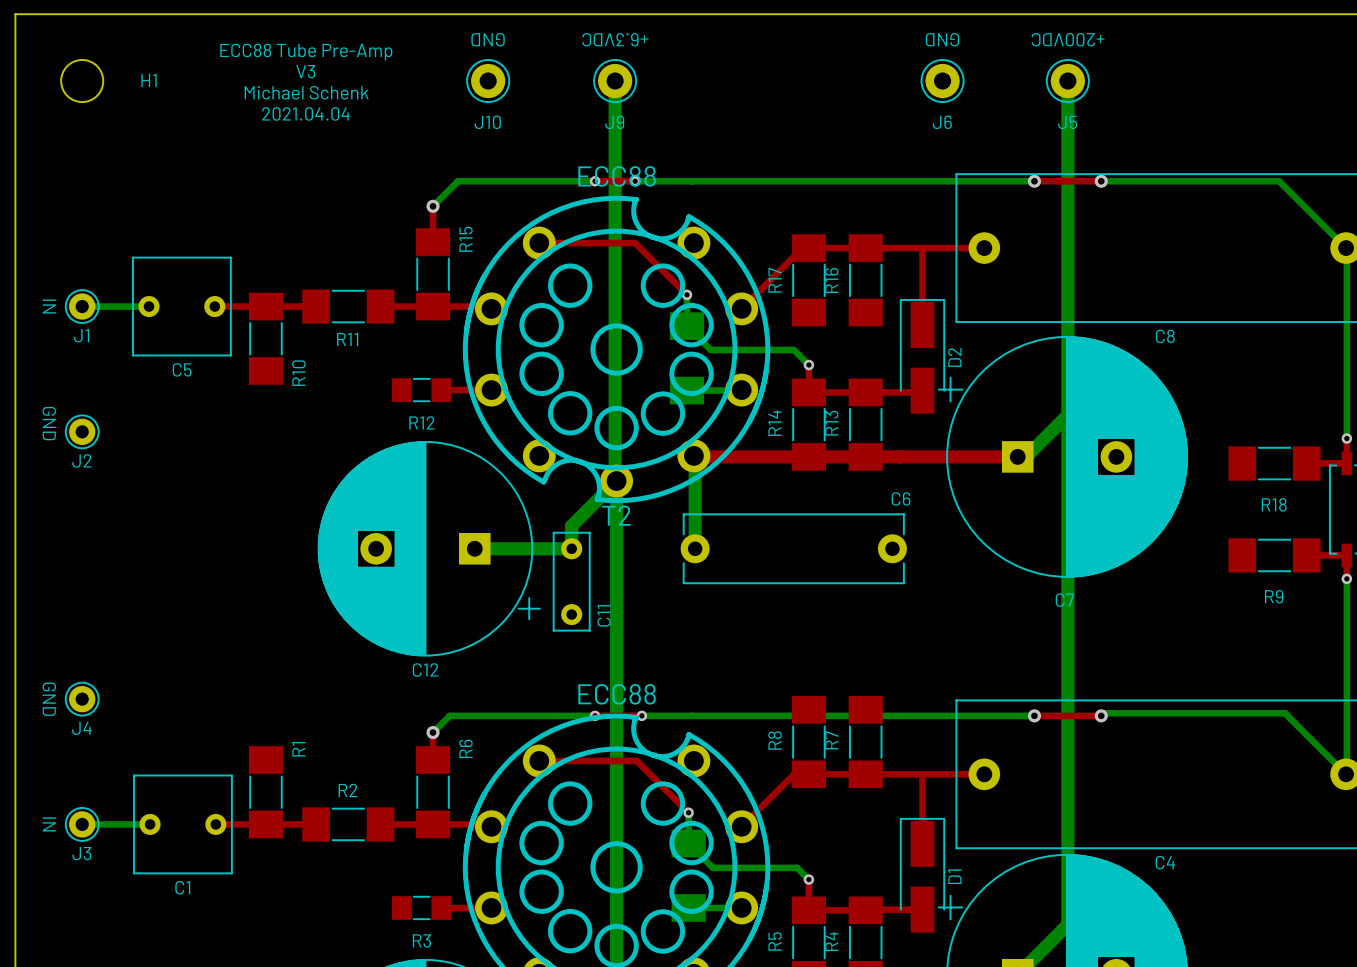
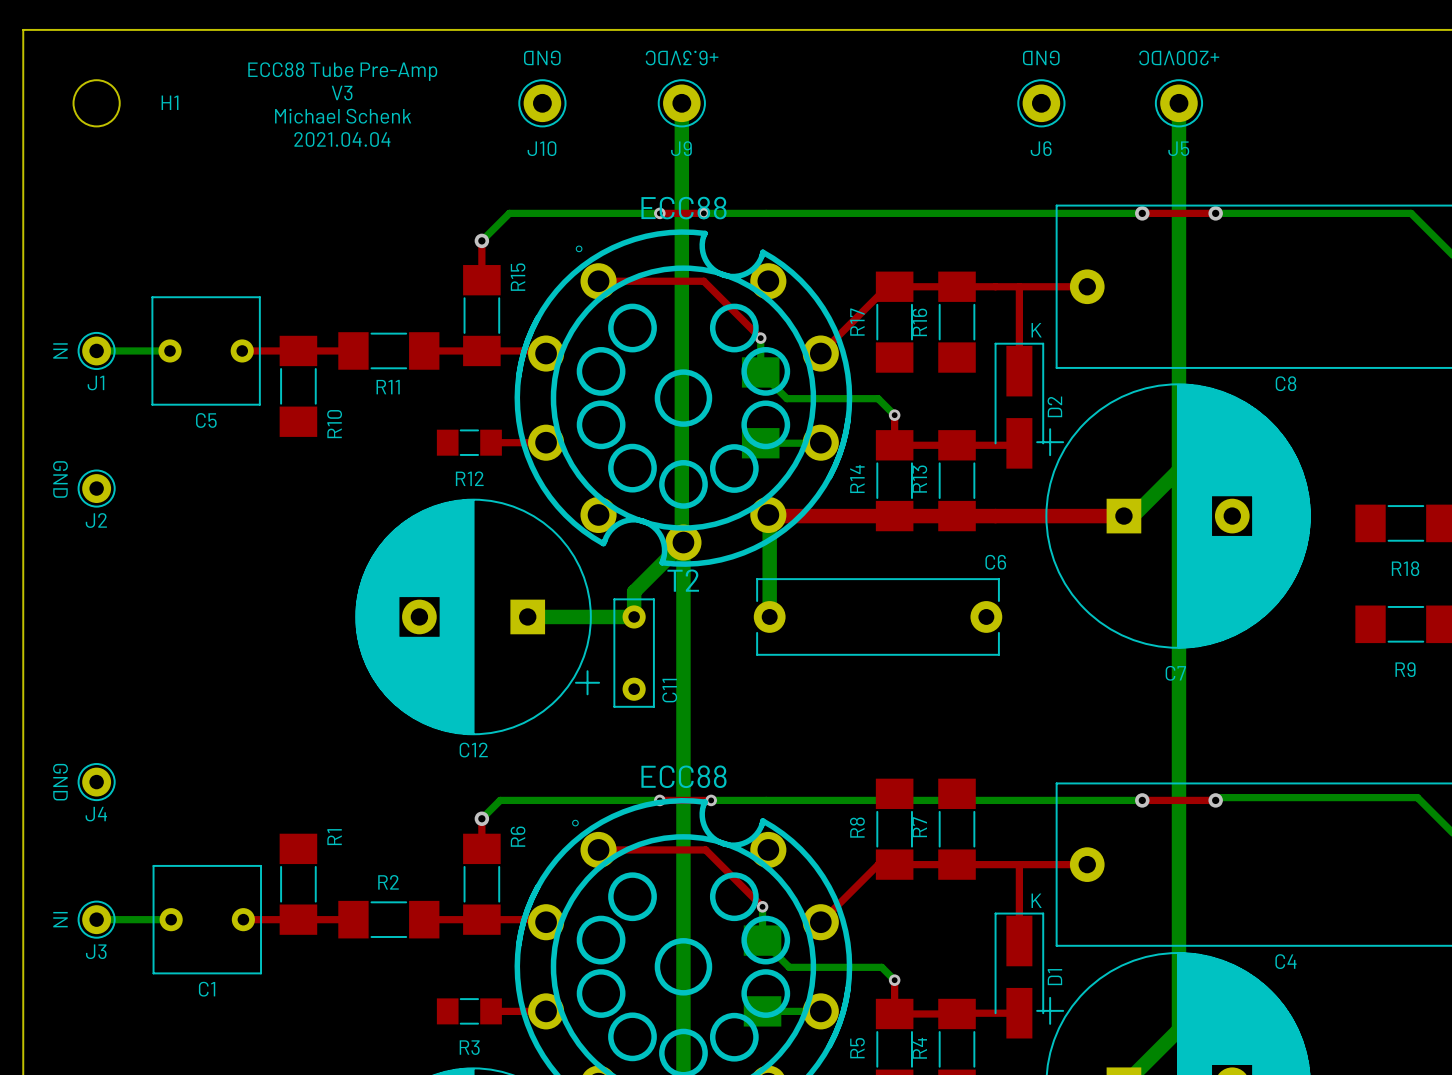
text: none -> ° (579, 248)
text: none -> K (1036, 330)
text: none -> ° (575, 823)
text: none -> K (1036, 900)

